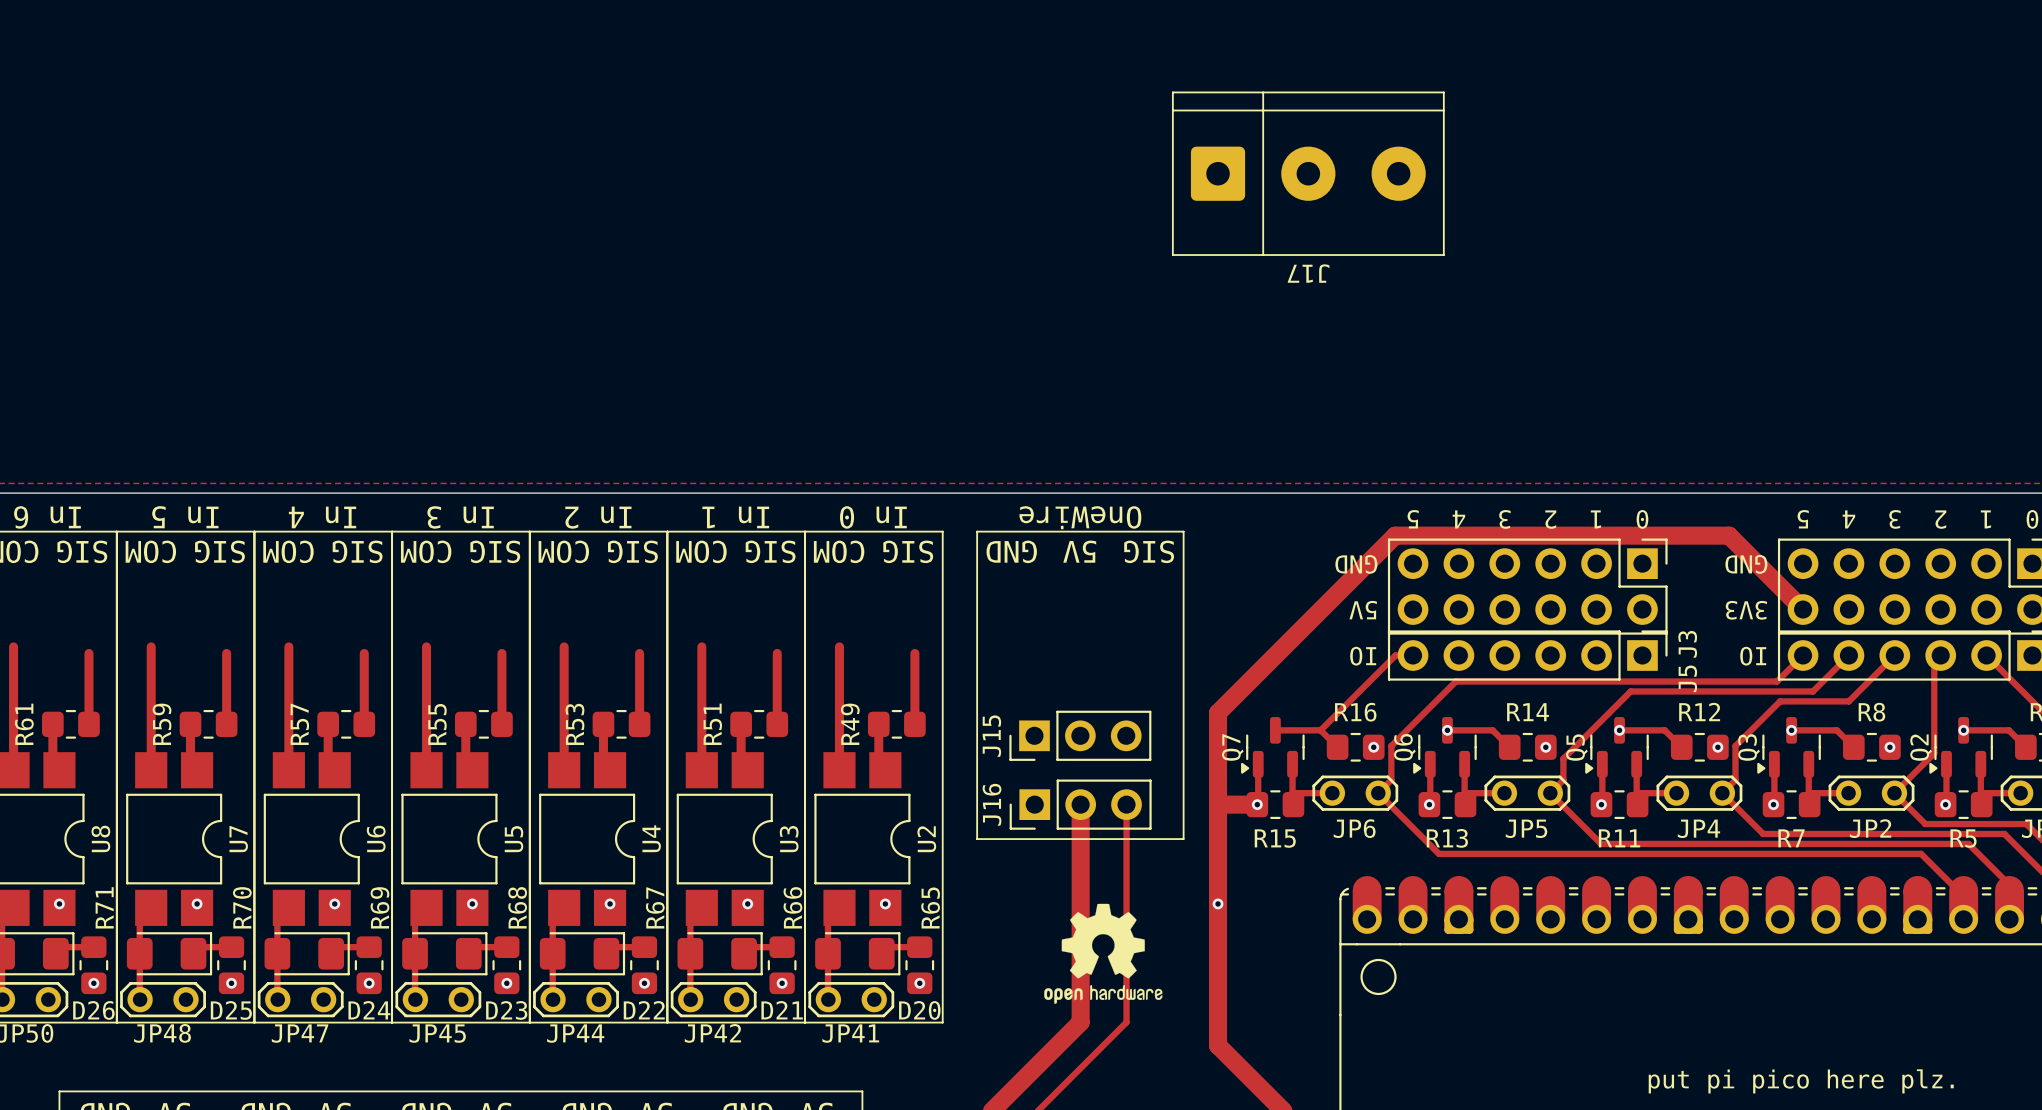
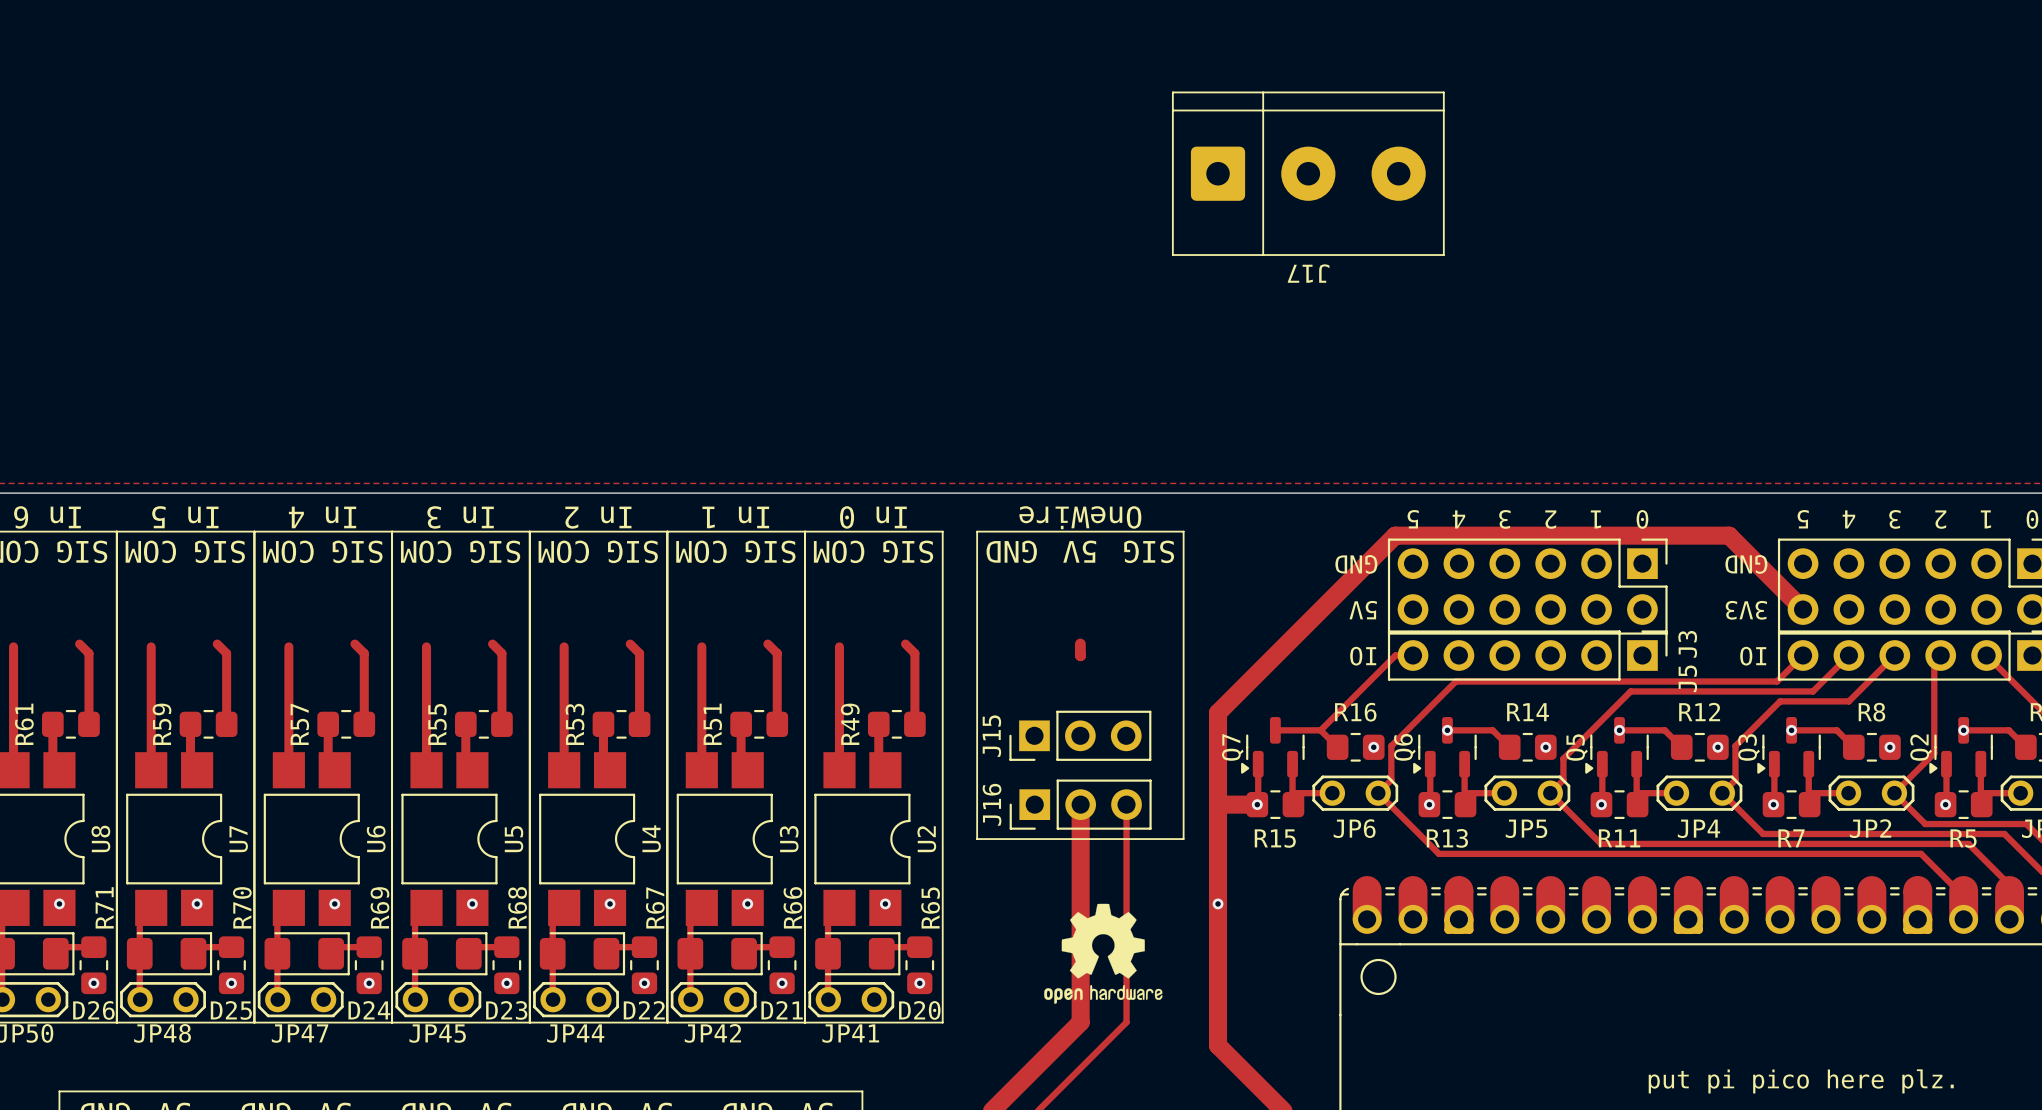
track: none -> (79, 644) (88, 653)
track: none -> (217, 644) (226, 653)
track: none -> (354, 644) (364, 653)
track: none -> (492, 644) (501, 653)
track: none -> (630, 644) (639, 653)
track: none -> (767, 644) (777, 653)
track: none -> (905, 644) (914, 653)
track: none -> (1080, 644) (1080, 655)

